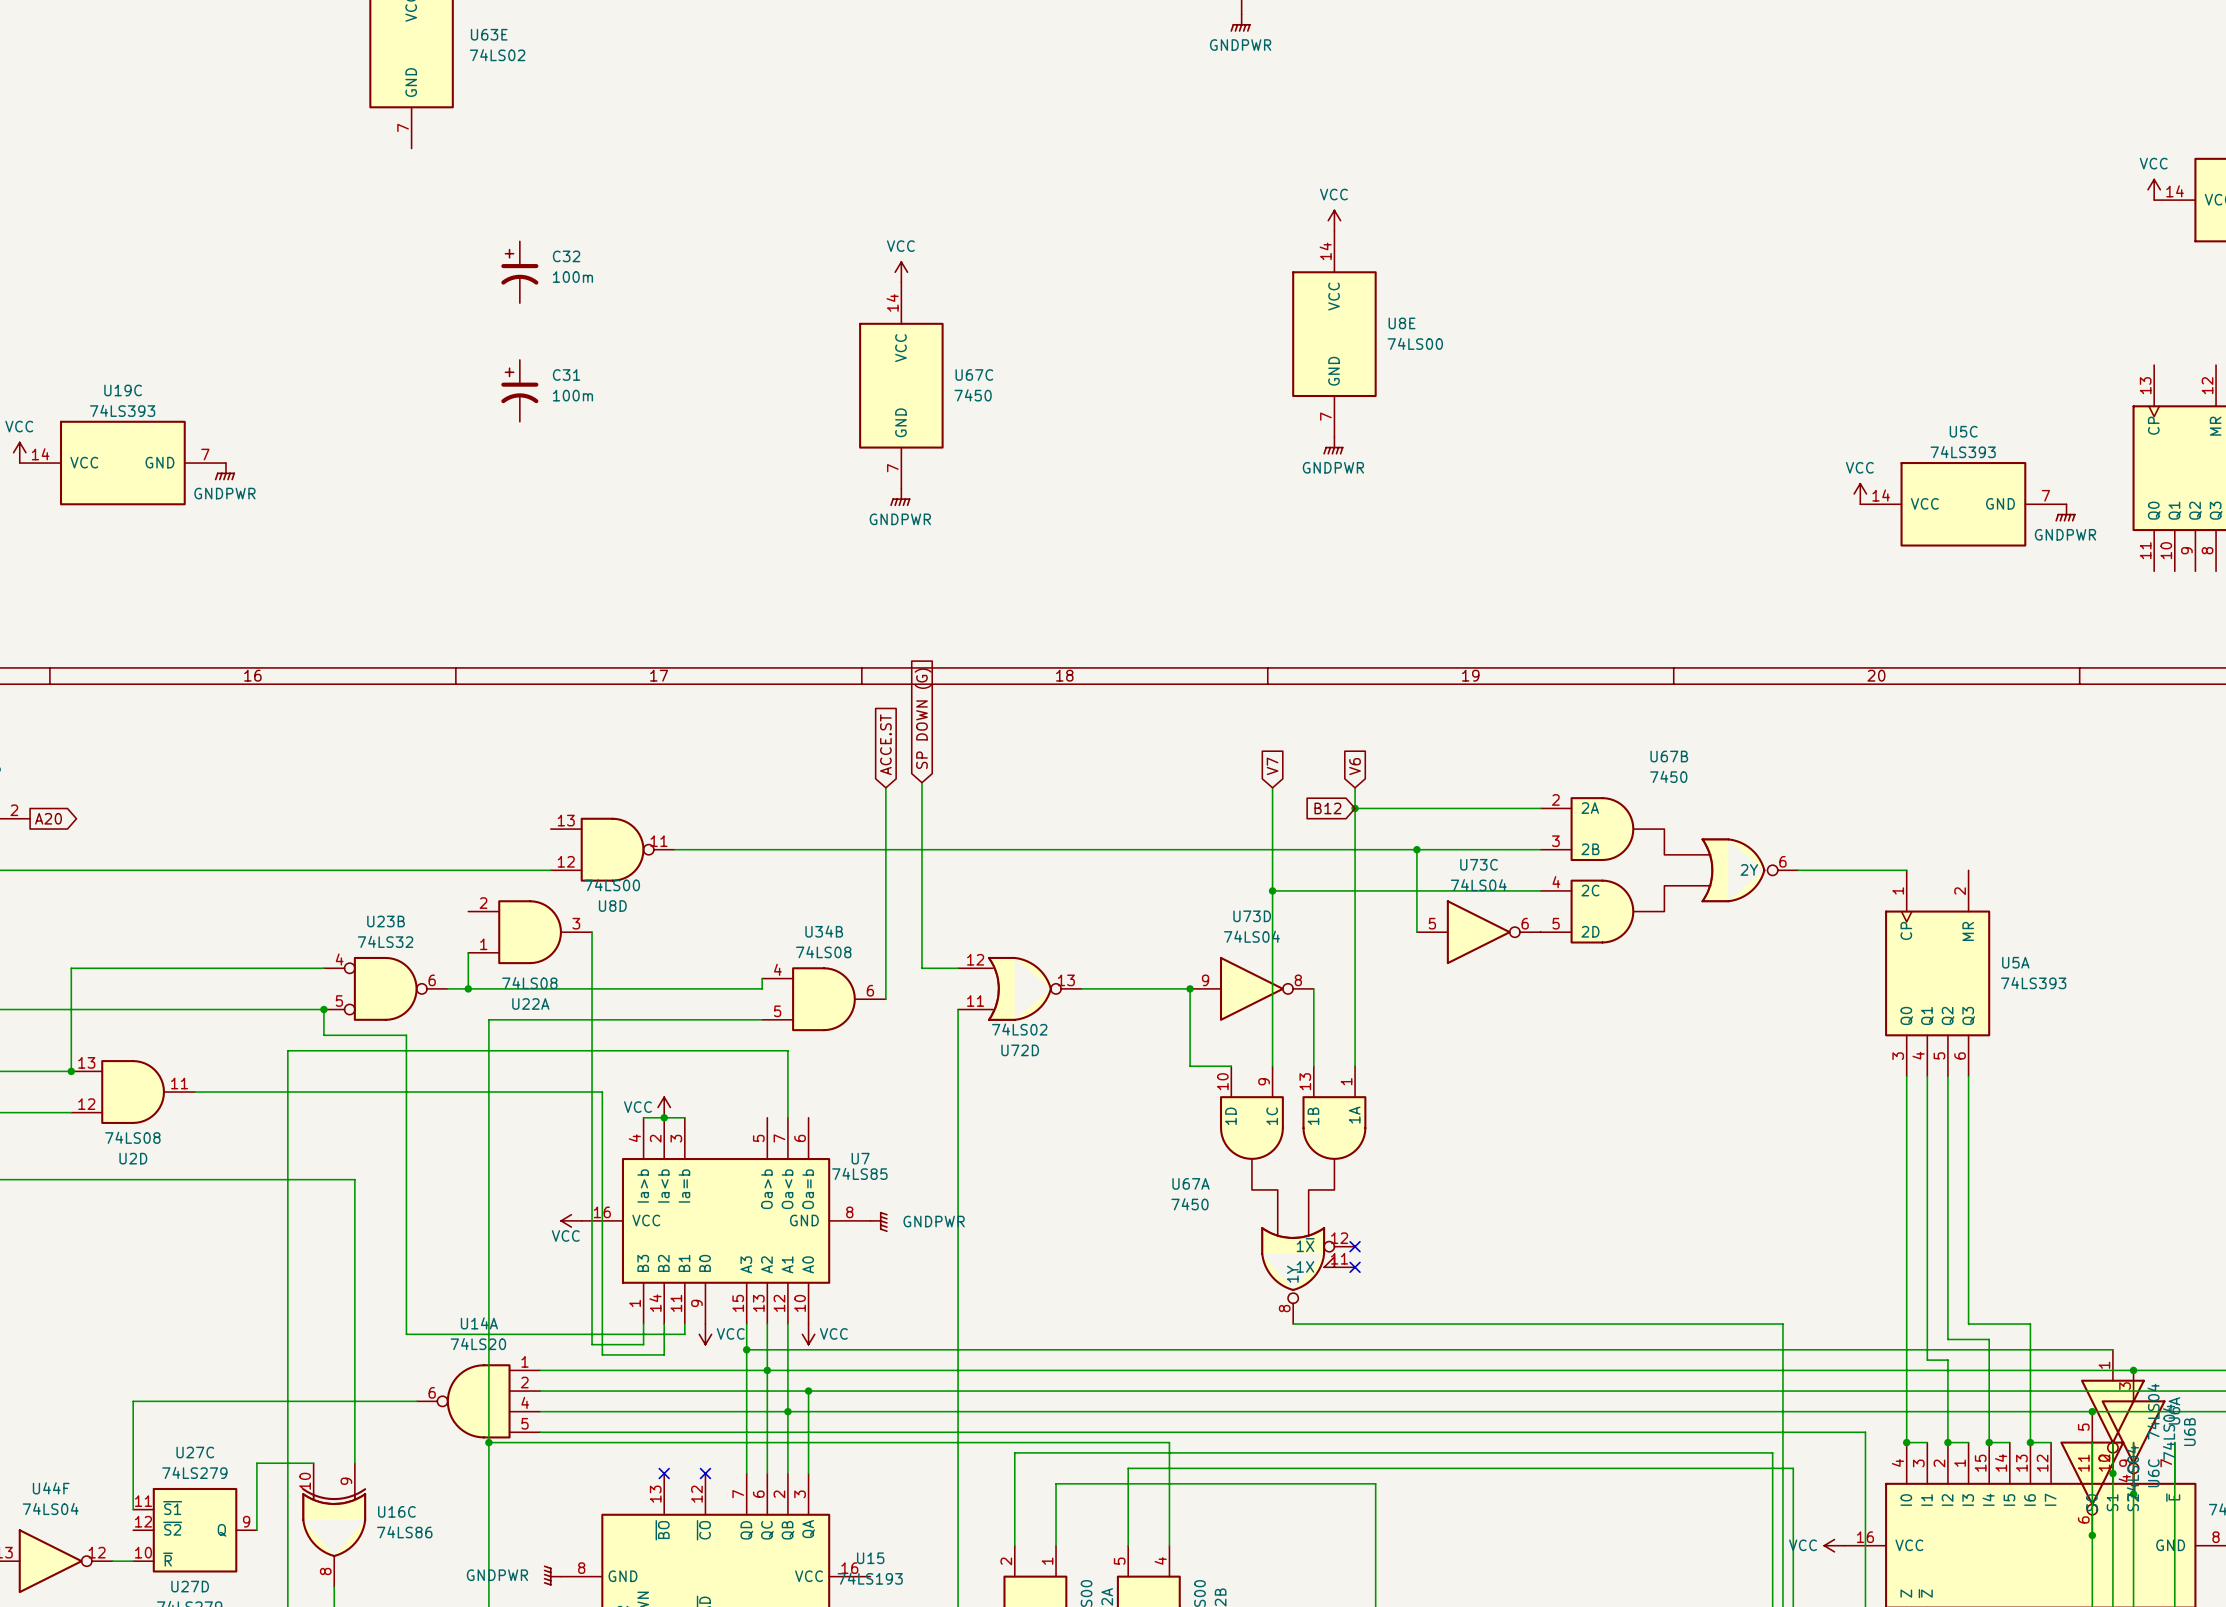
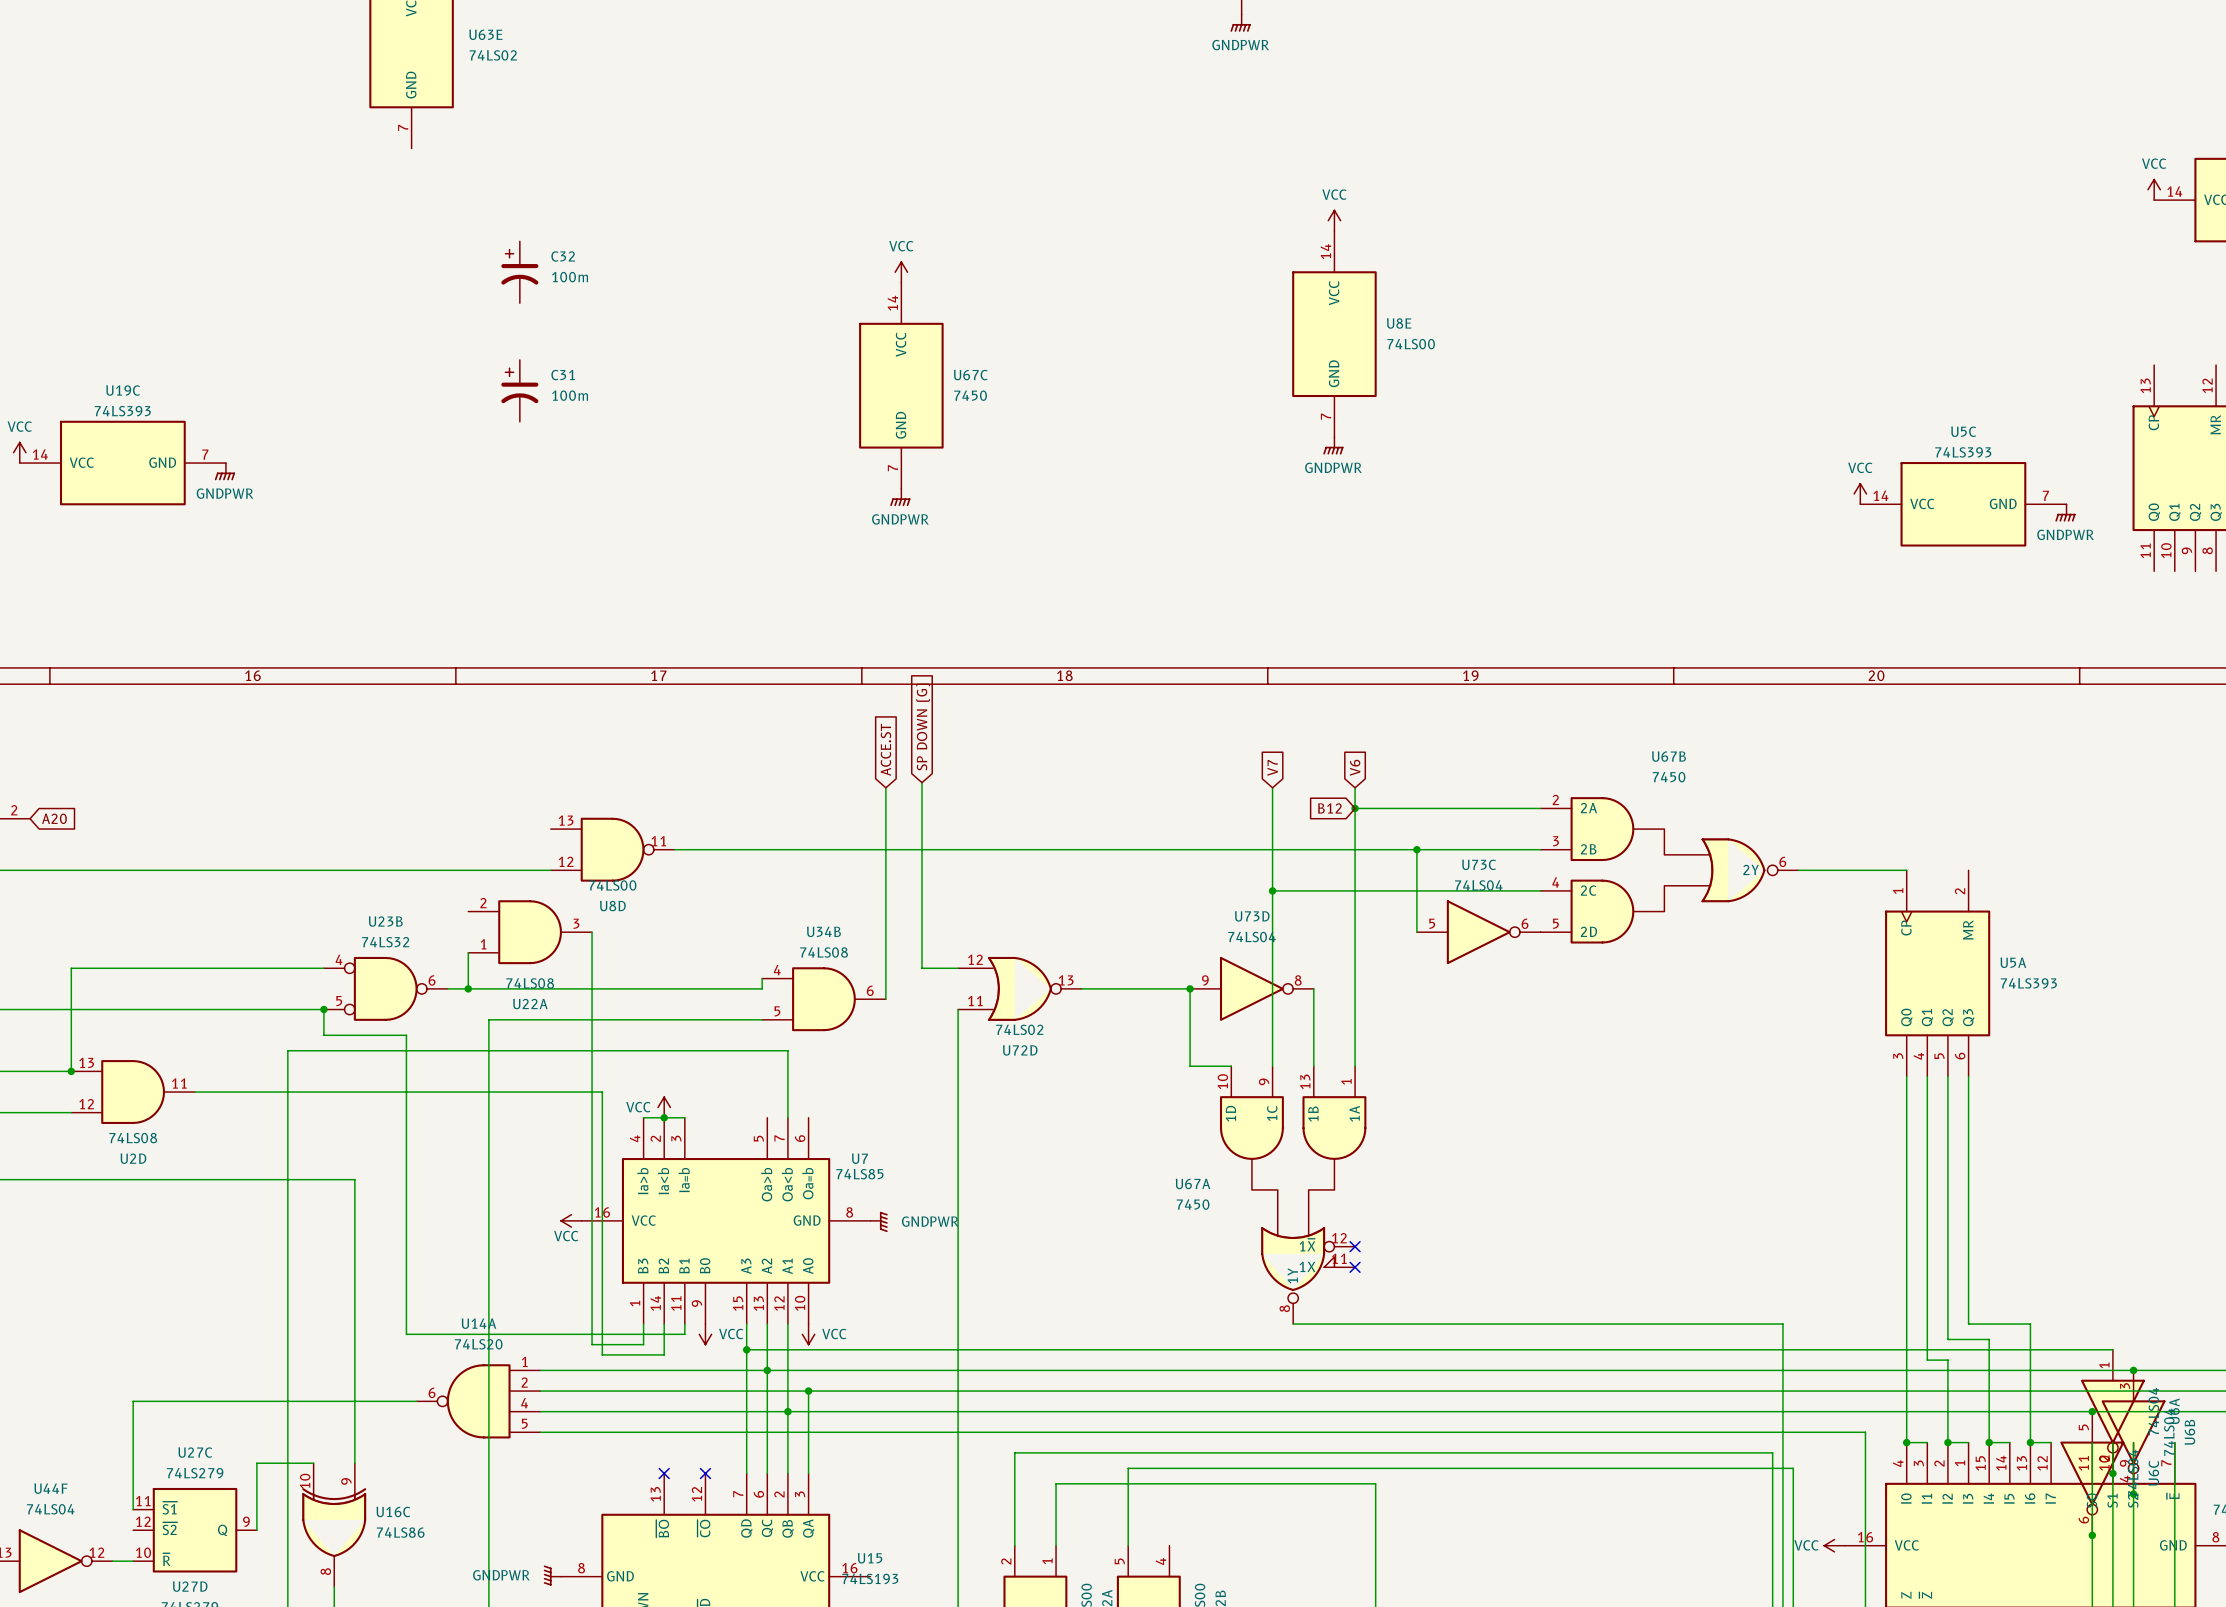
global label shape: output (48, 818) -> input (54, 818)
wire: (488, 1442) (1169, 1442) (1169, 1545) -> none
junction: (488, 1442) -> none

